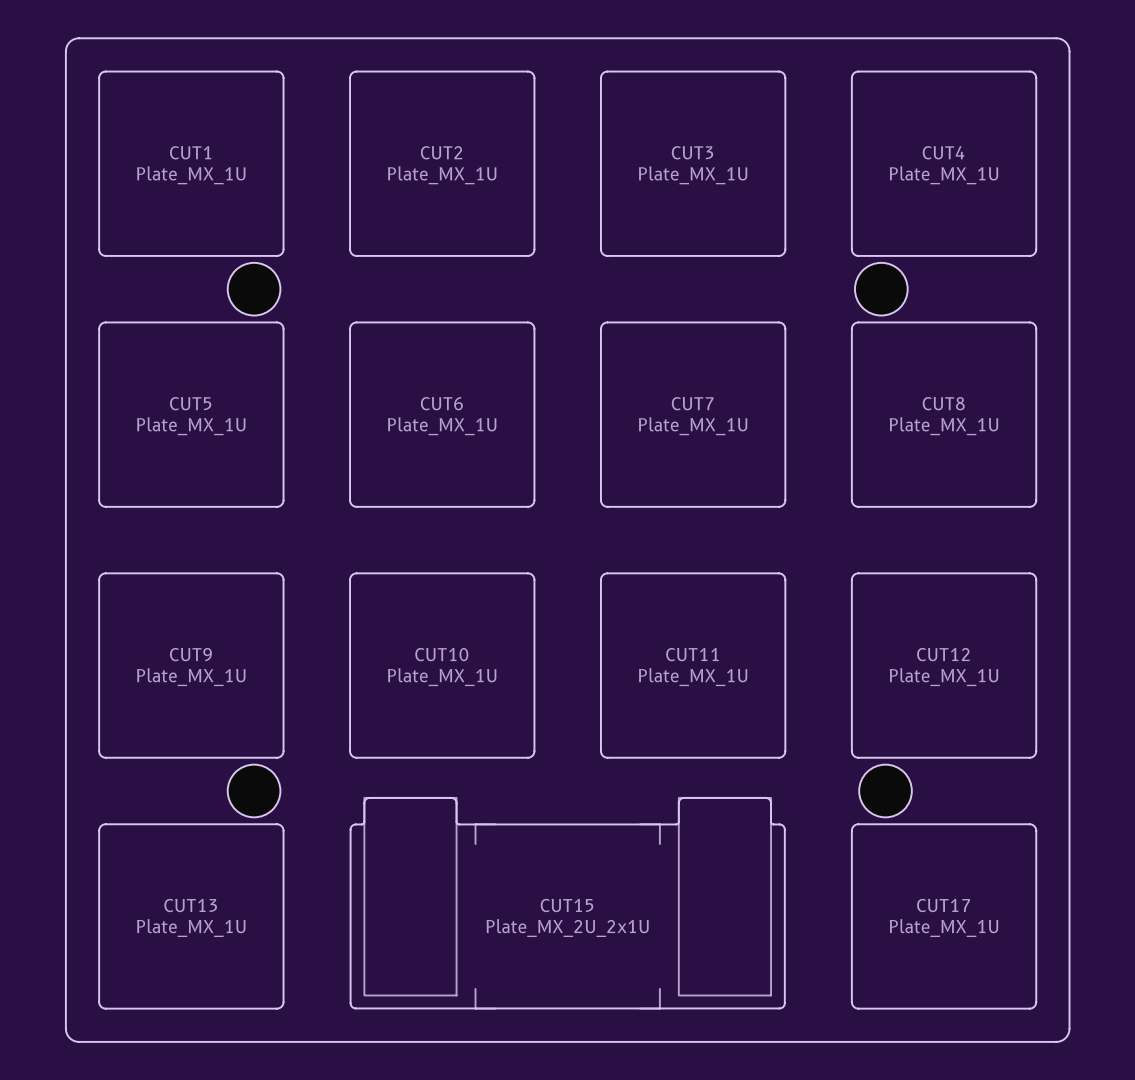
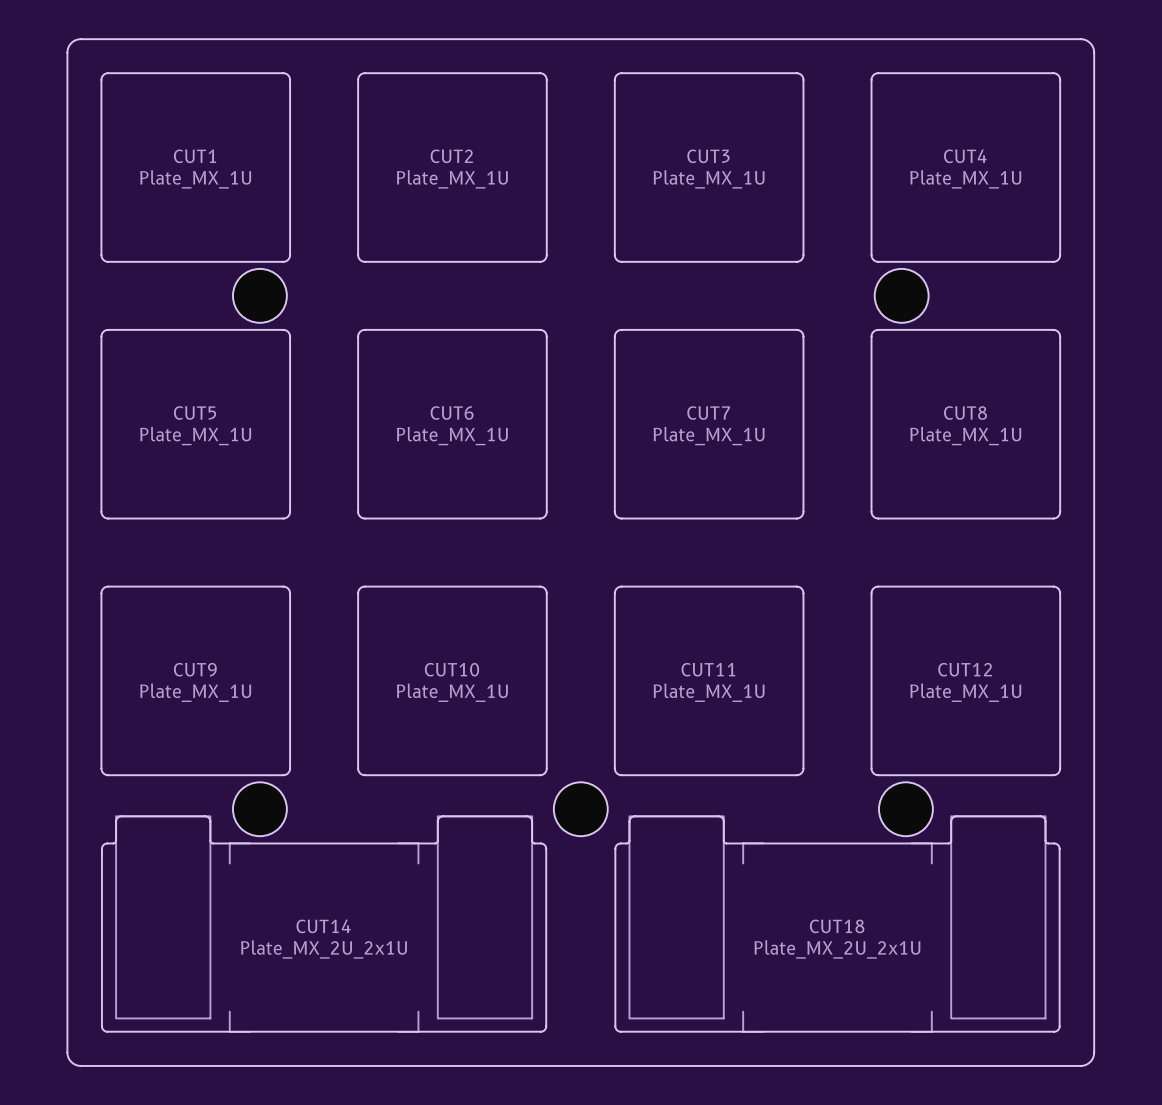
part: none -> (580, 809)
CUT14: none -> Plate_MX_2U_2x1U (324, 924)
CUT15: Plate_MX_2U_2x1U (567, 903) -> none
CUT18: none -> Plate_MX_2U_2x1U (837, 924)
CUT13: Plate_MX_1U (191, 916) -> none
CUT17: Plate_MX_1U (944, 916) -> none

